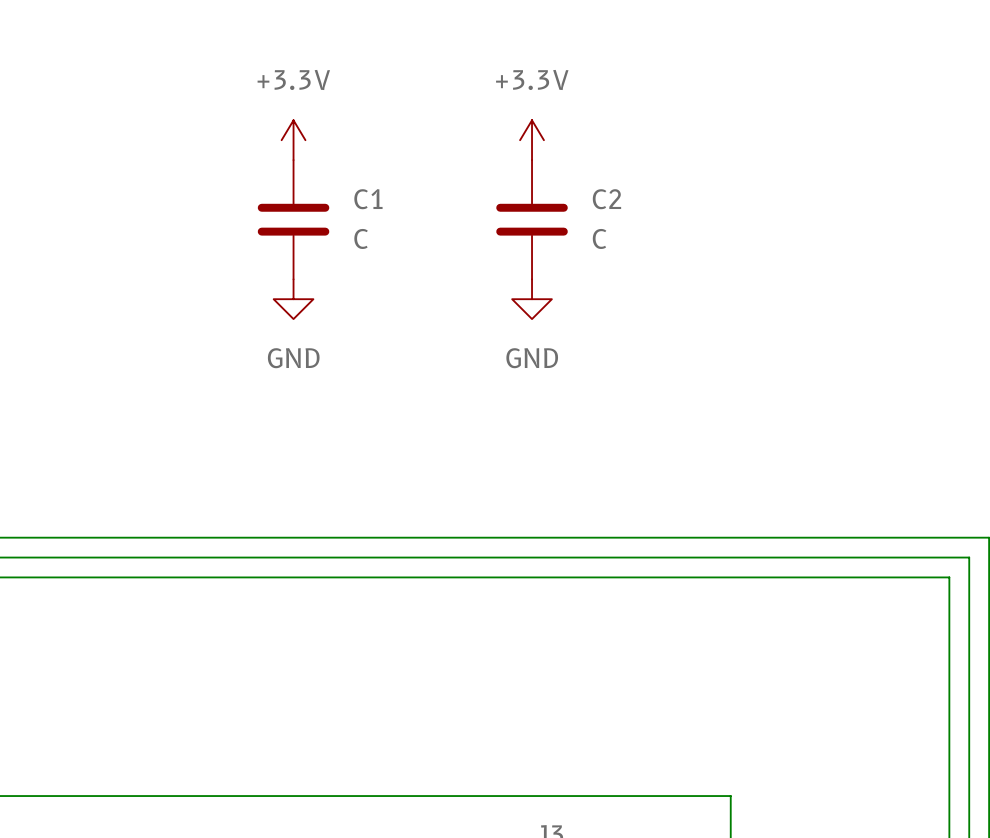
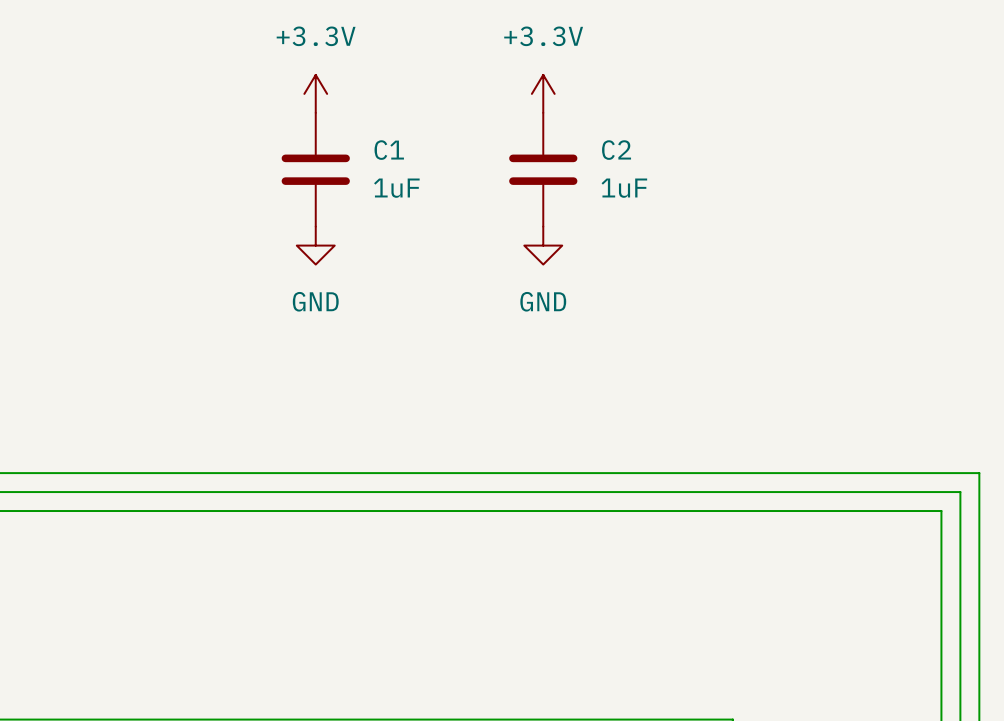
C1 value: C (361, 238) -> 1uF (396, 188)
C2 value: C (599, 238) -> 1uF (624, 188)

